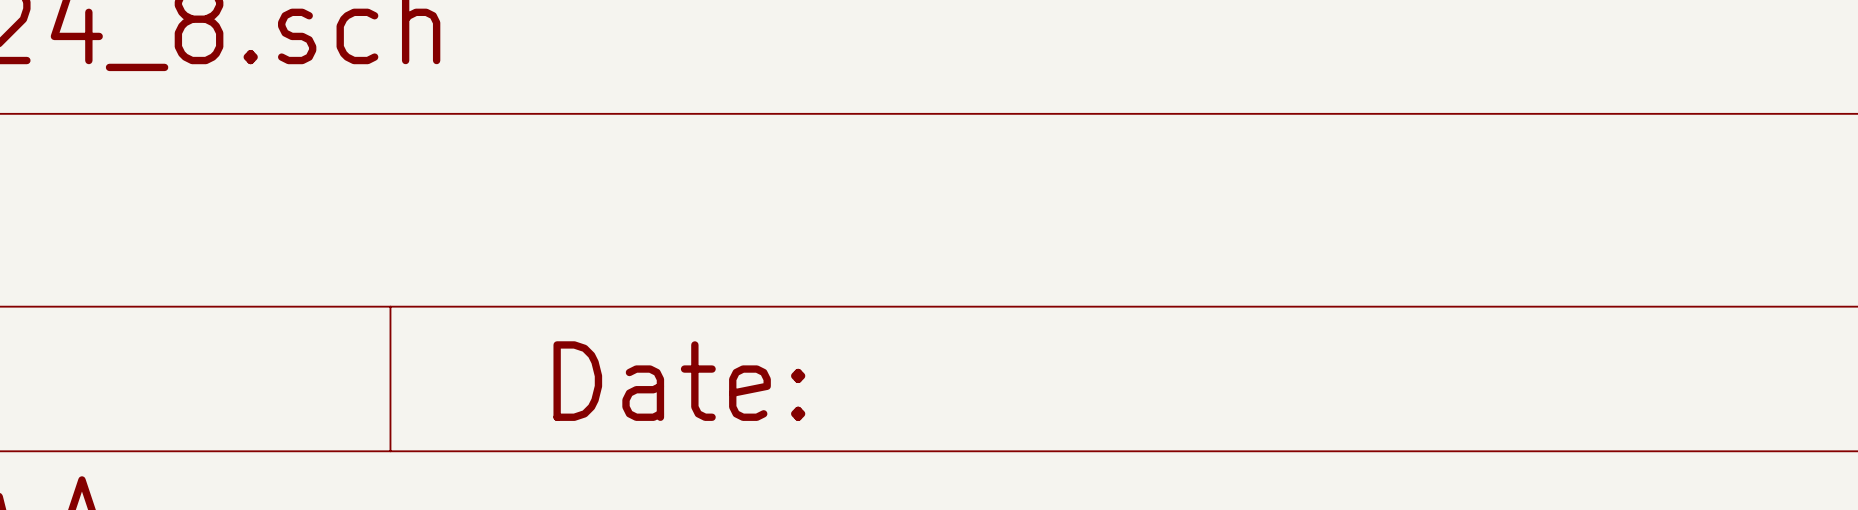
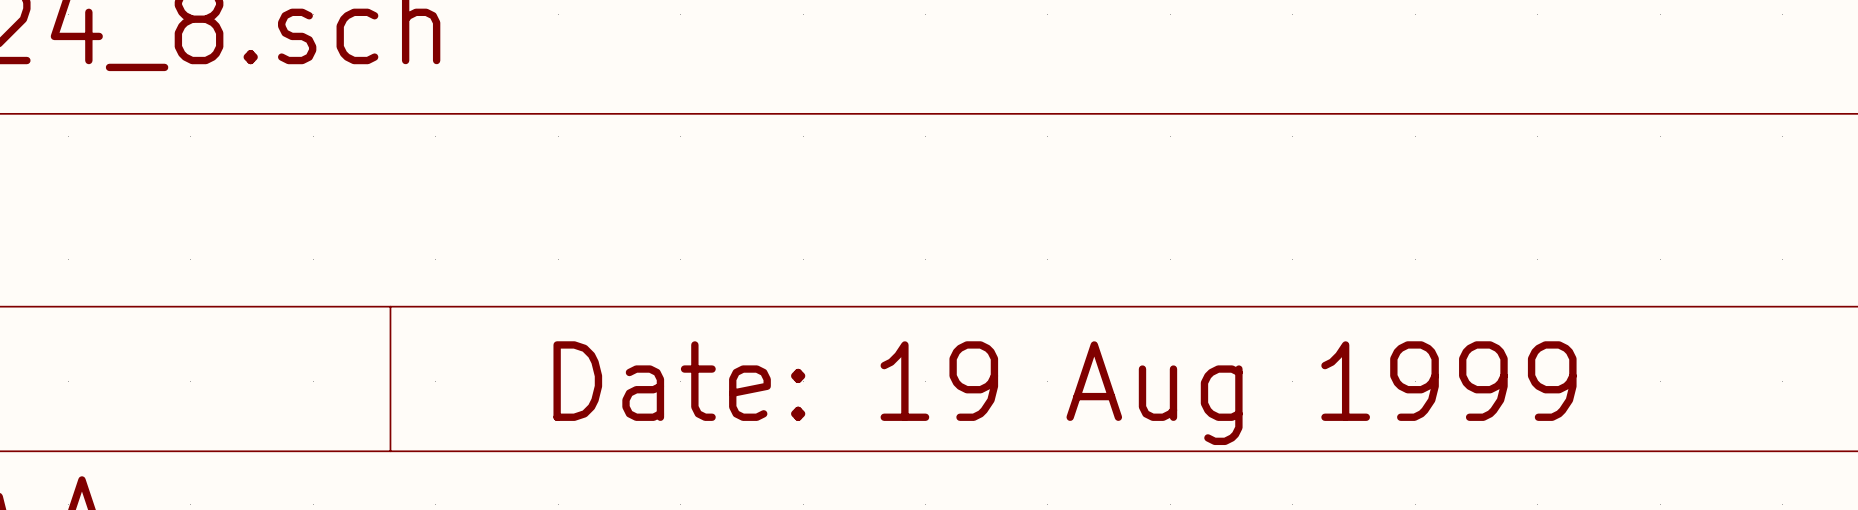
title block: Date: (679, 381) -> Date: 19 Aug 1999 (1065, 393)

